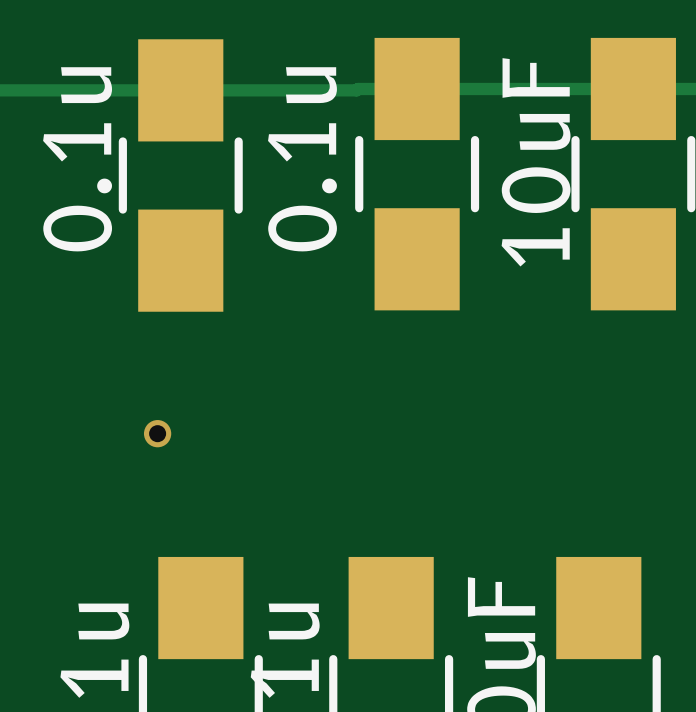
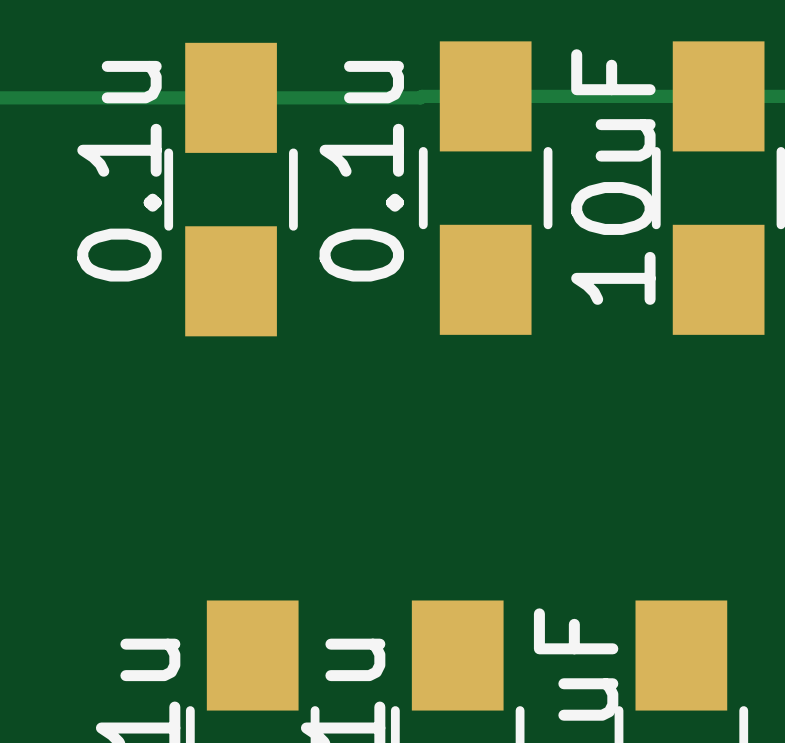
via: (157, 433) -> none

